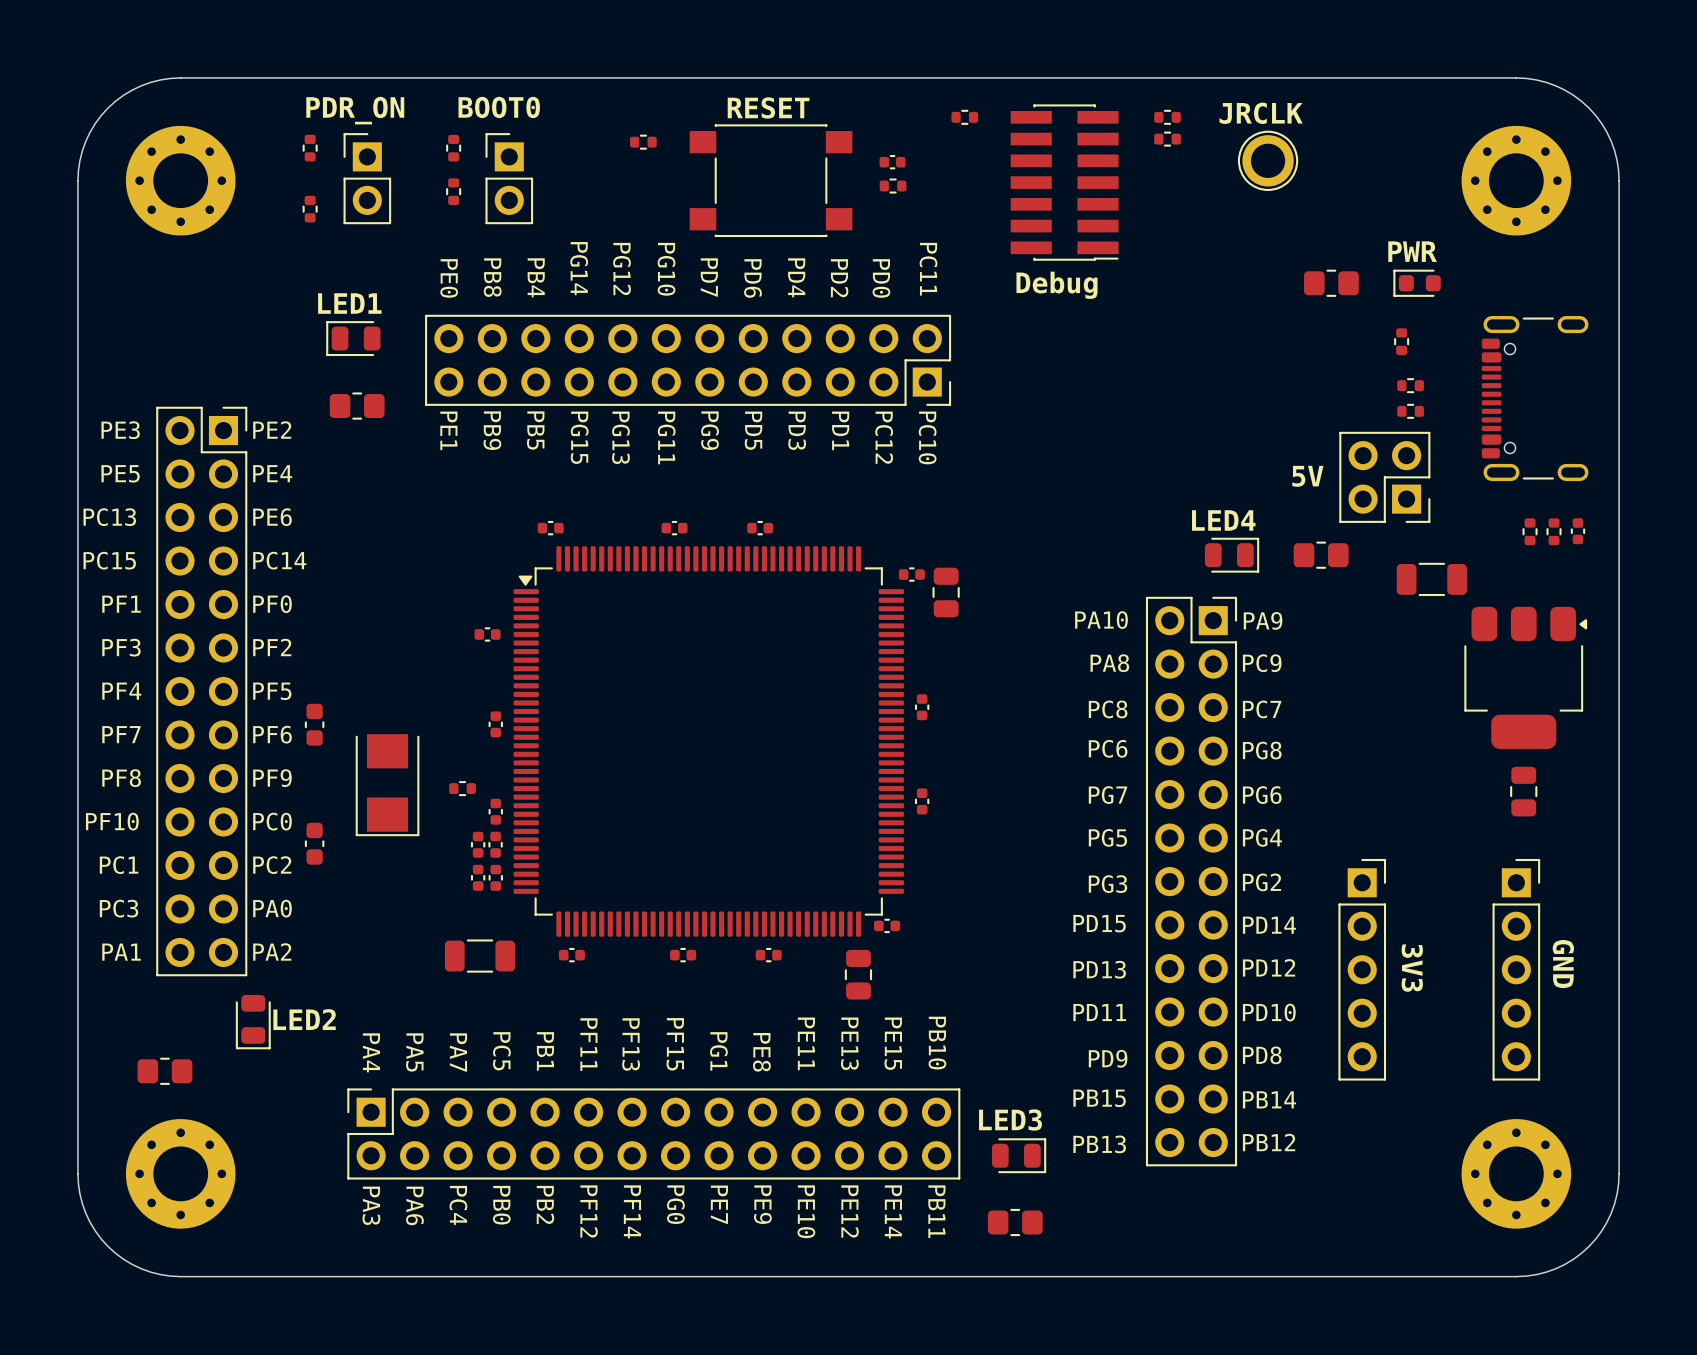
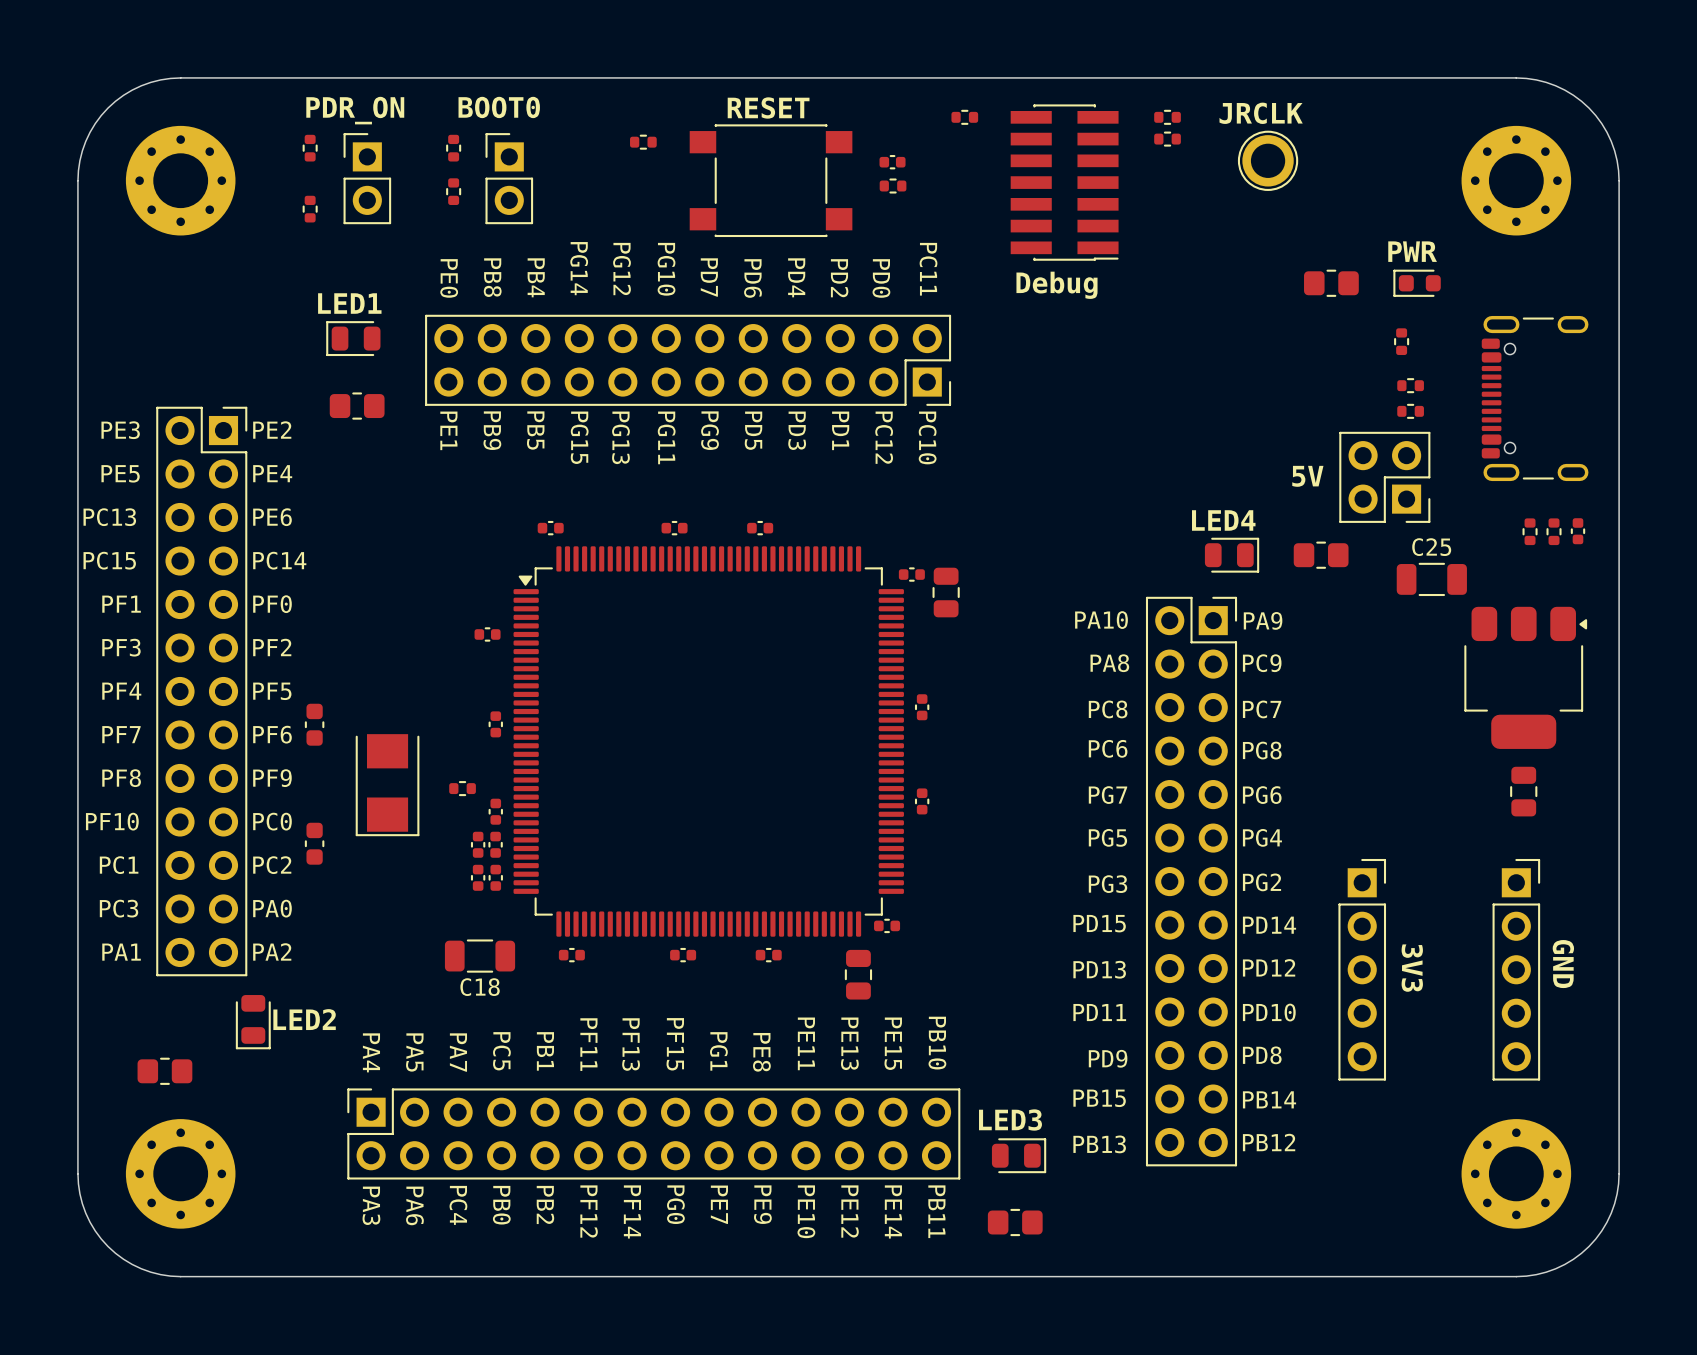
C25 name: none -> C25 (1431, 547)
C18 name: none -> C18 (480, 987)

